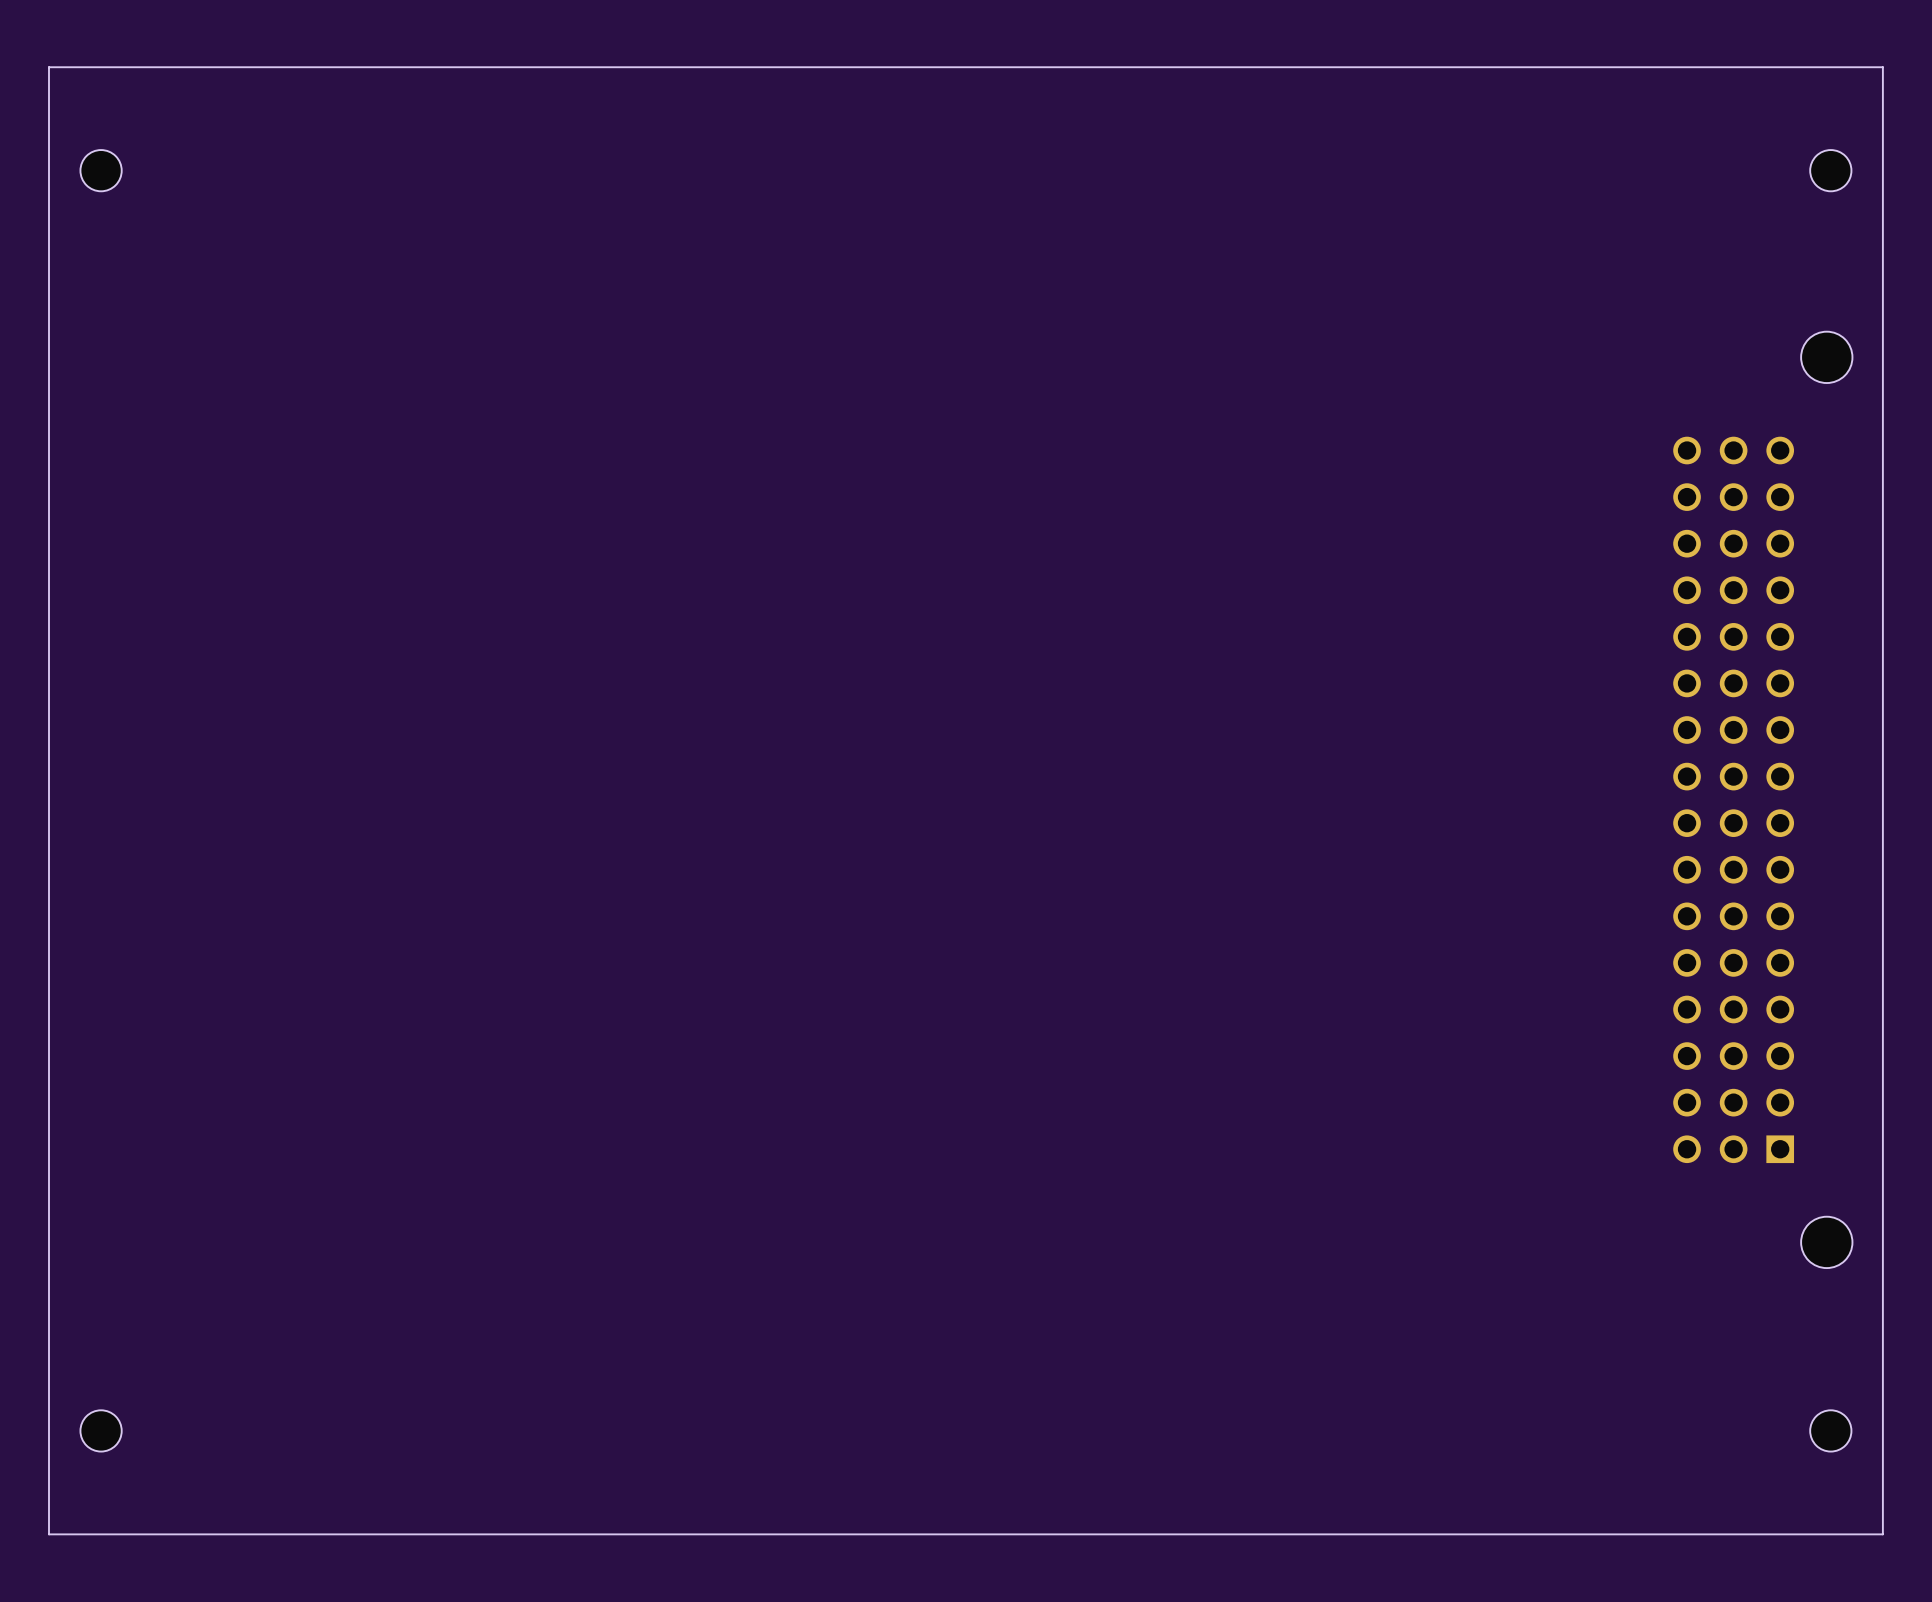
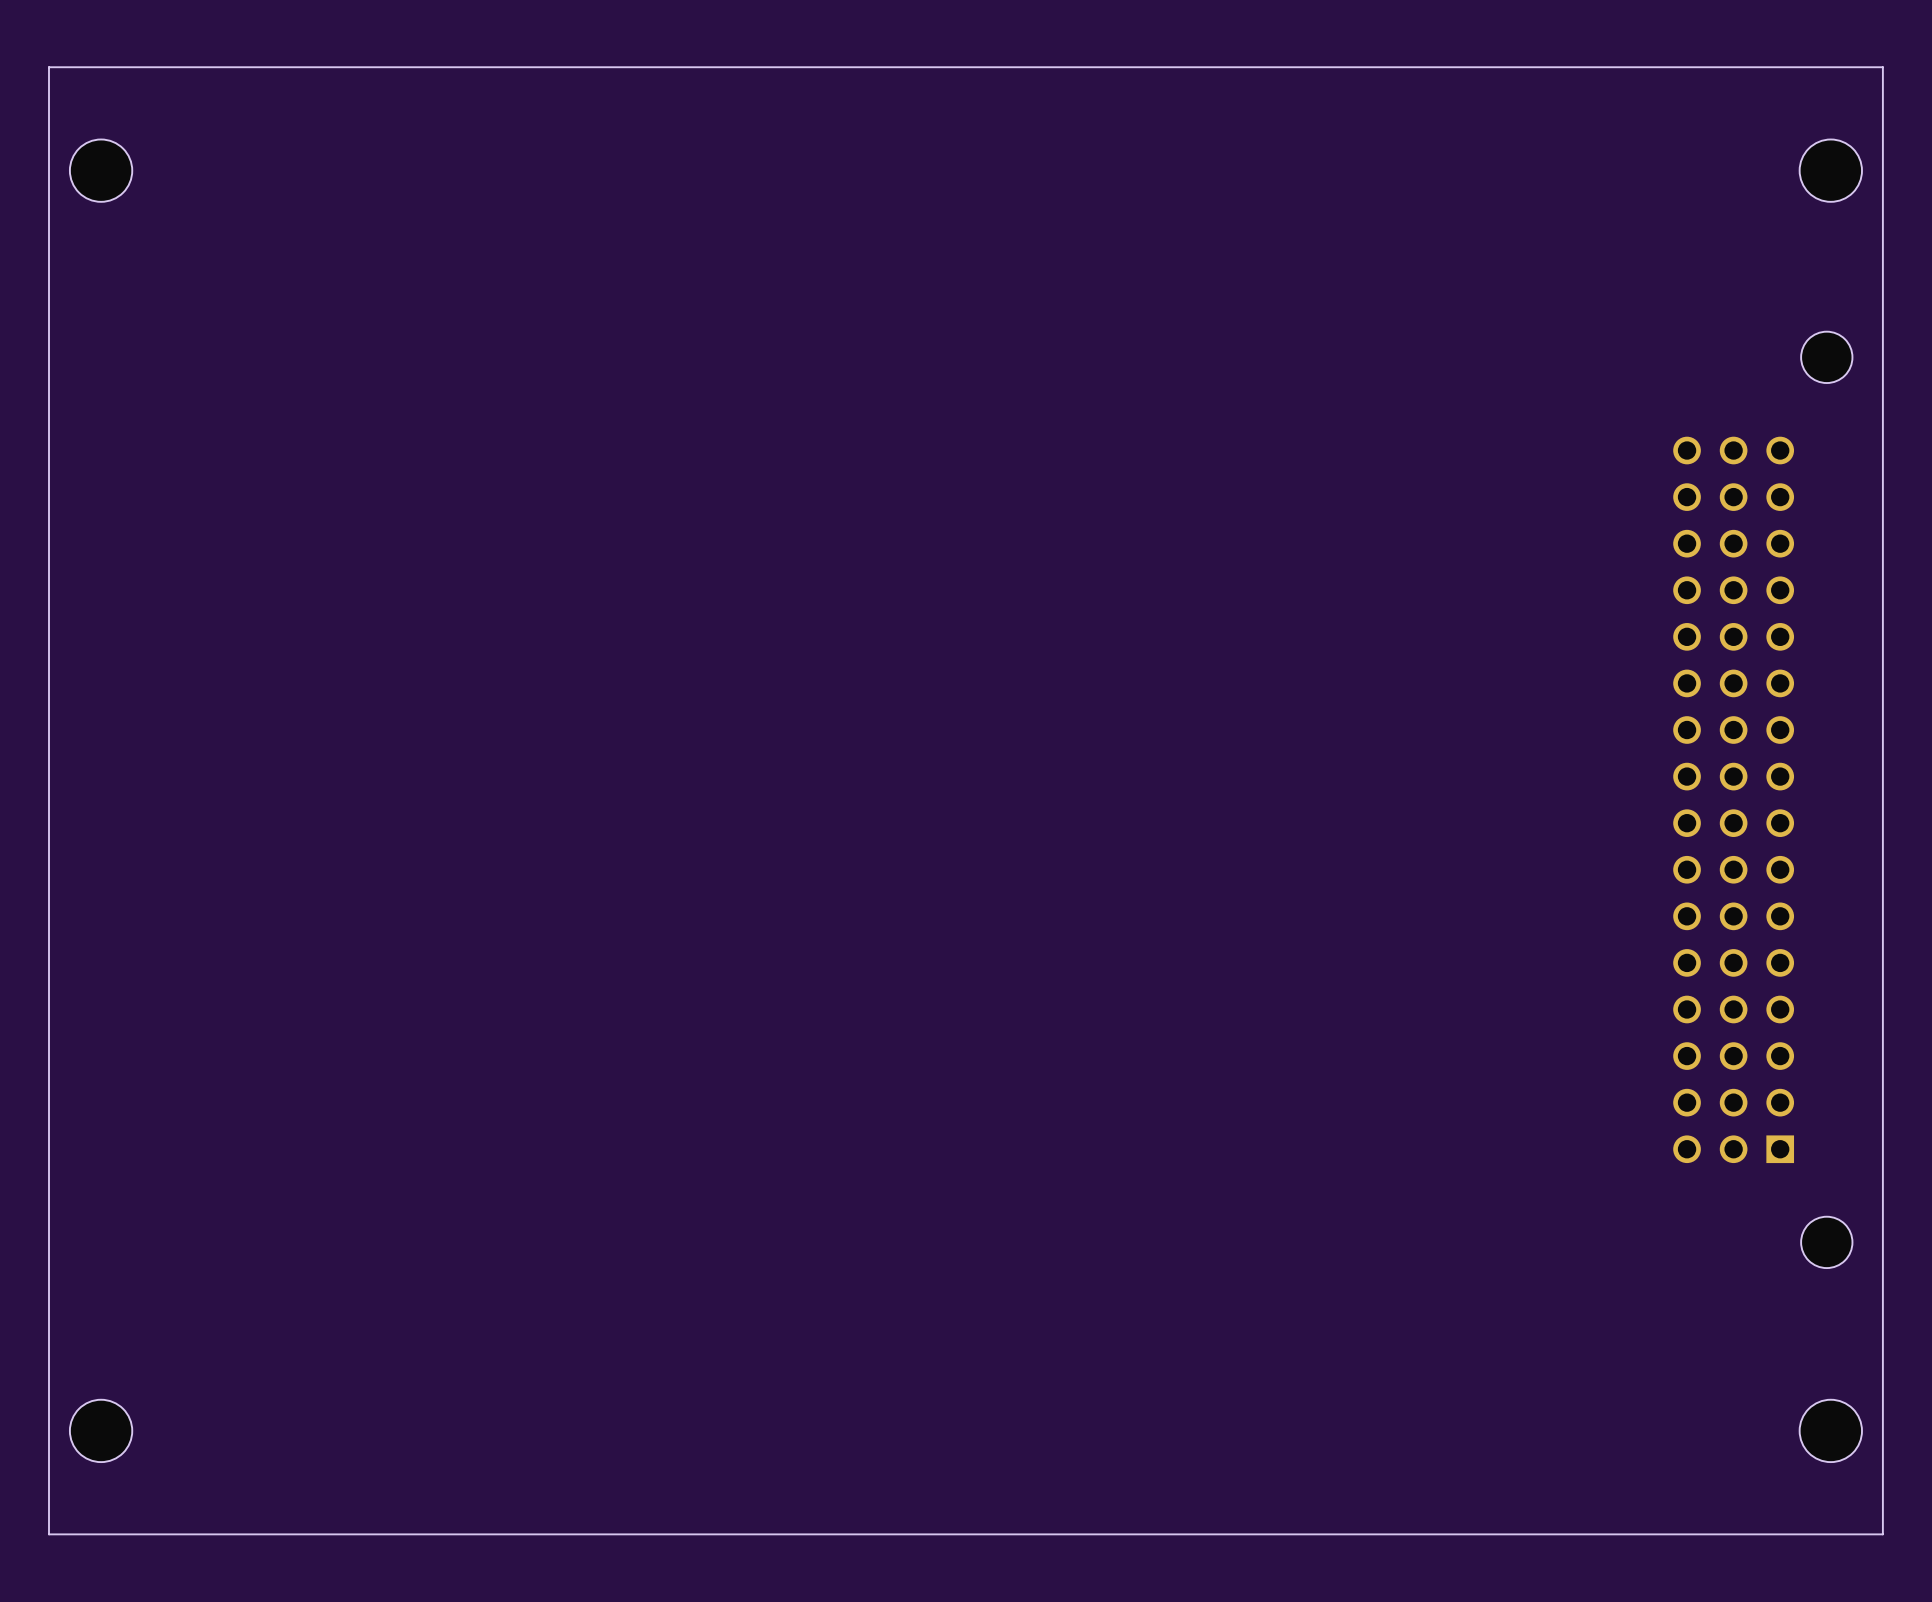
hole size: [80, 150, 122, 192] -> [69, 139, 133, 202]
hole size: [1810, 150, 1852, 192] -> [1799, 139, 1862, 202]
hole size: [80, 1410, 122, 1452] -> [69, 1399, 133, 1463]
hole size: [1810, 1410, 1852, 1452] -> [1799, 1399, 1862, 1463]

